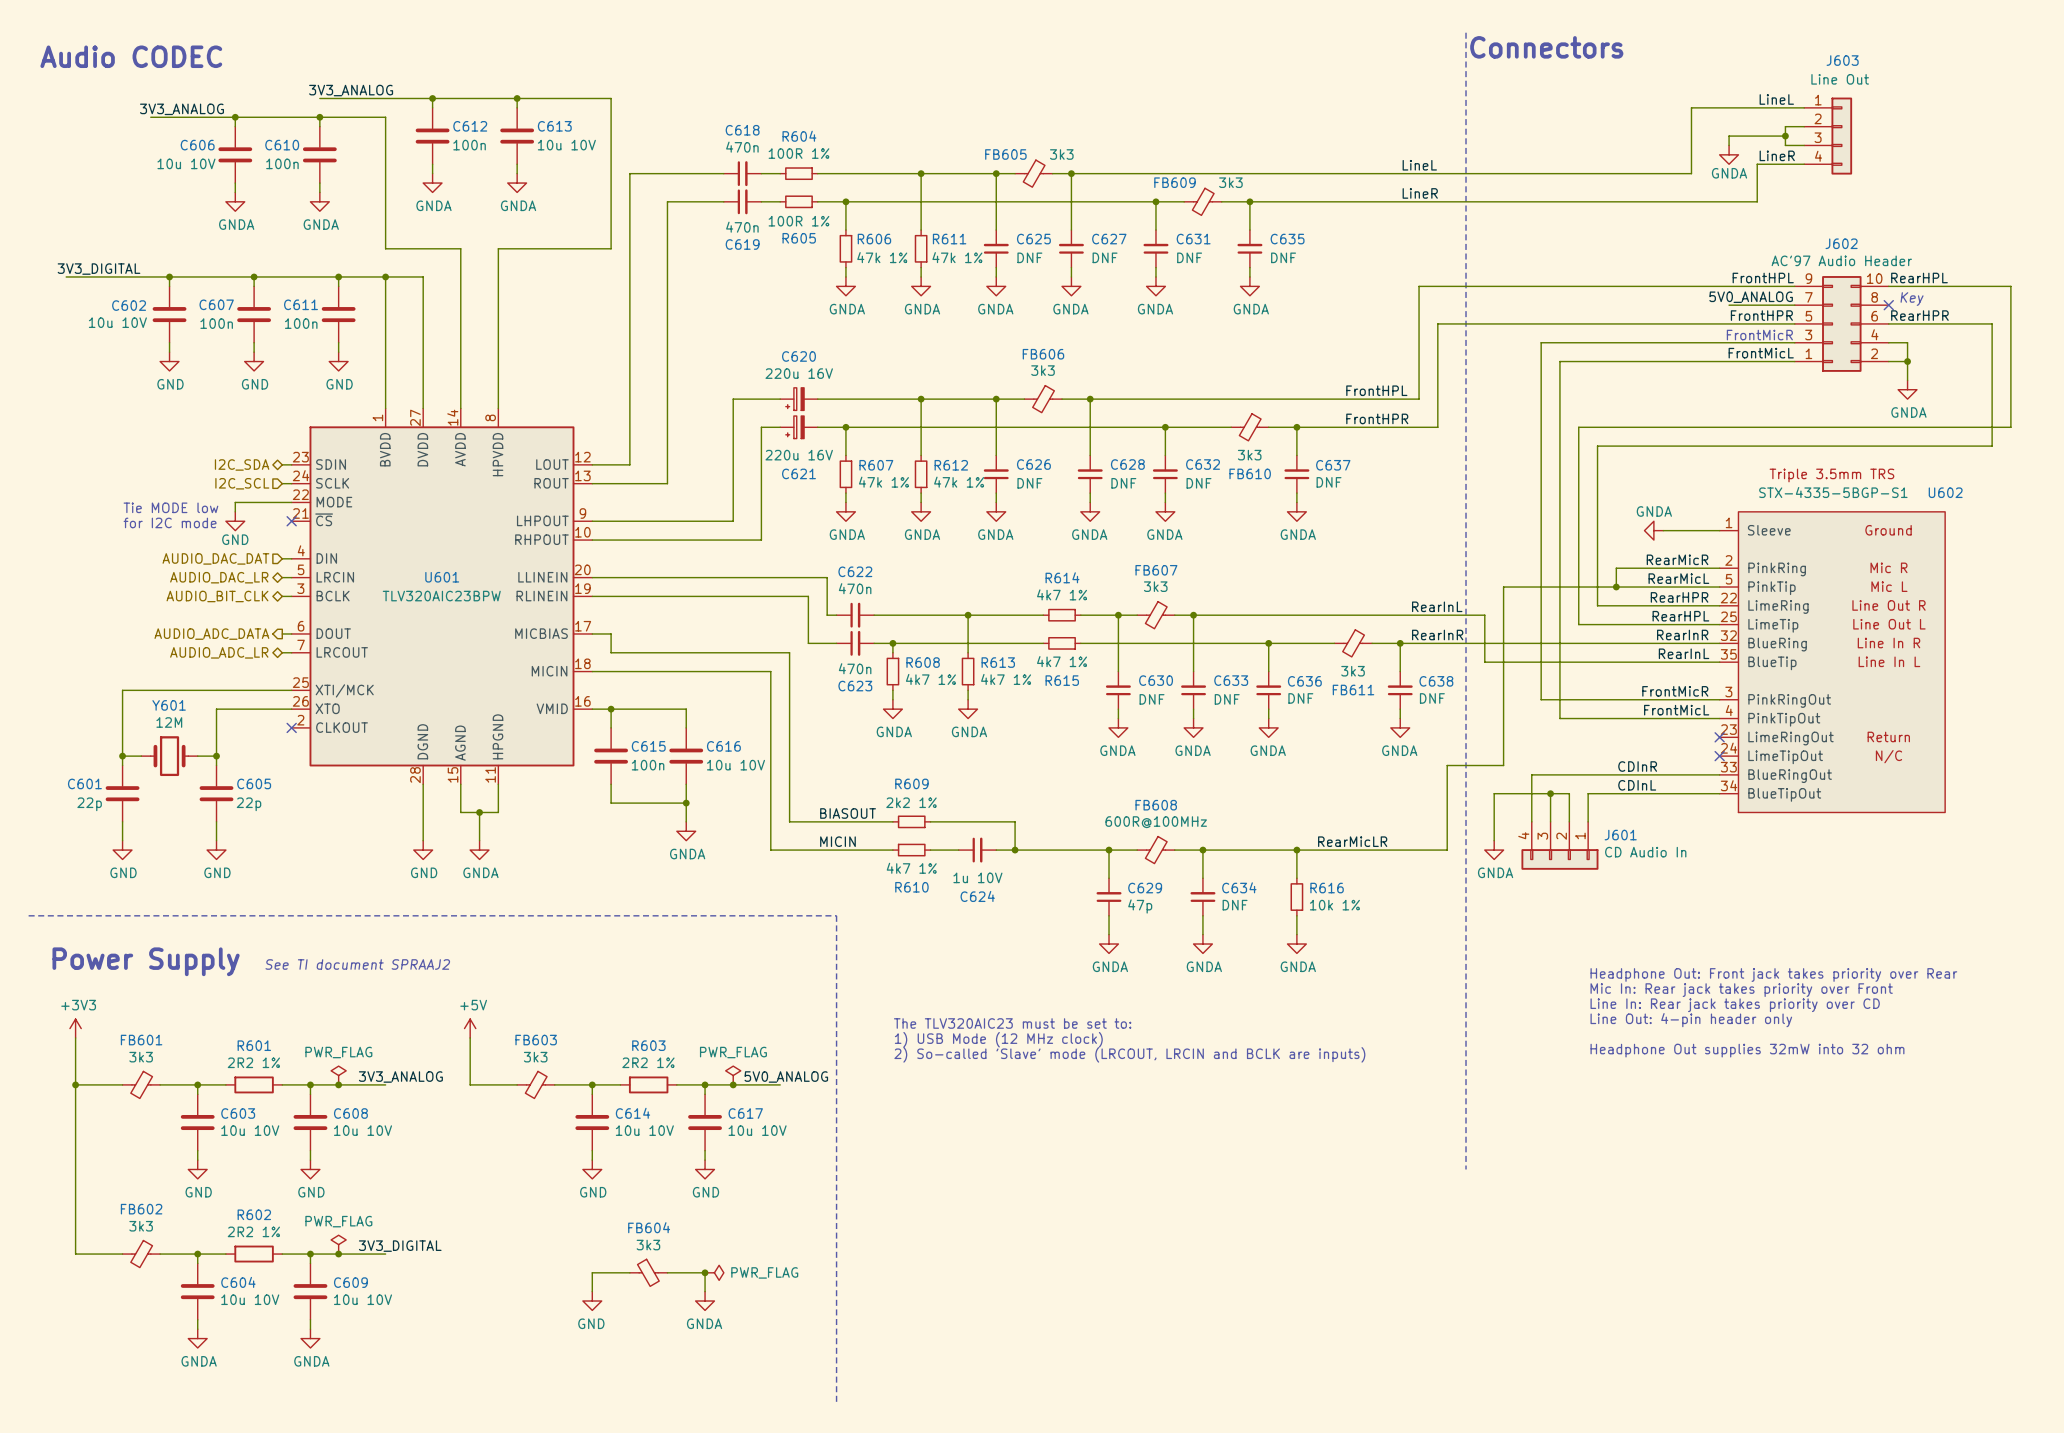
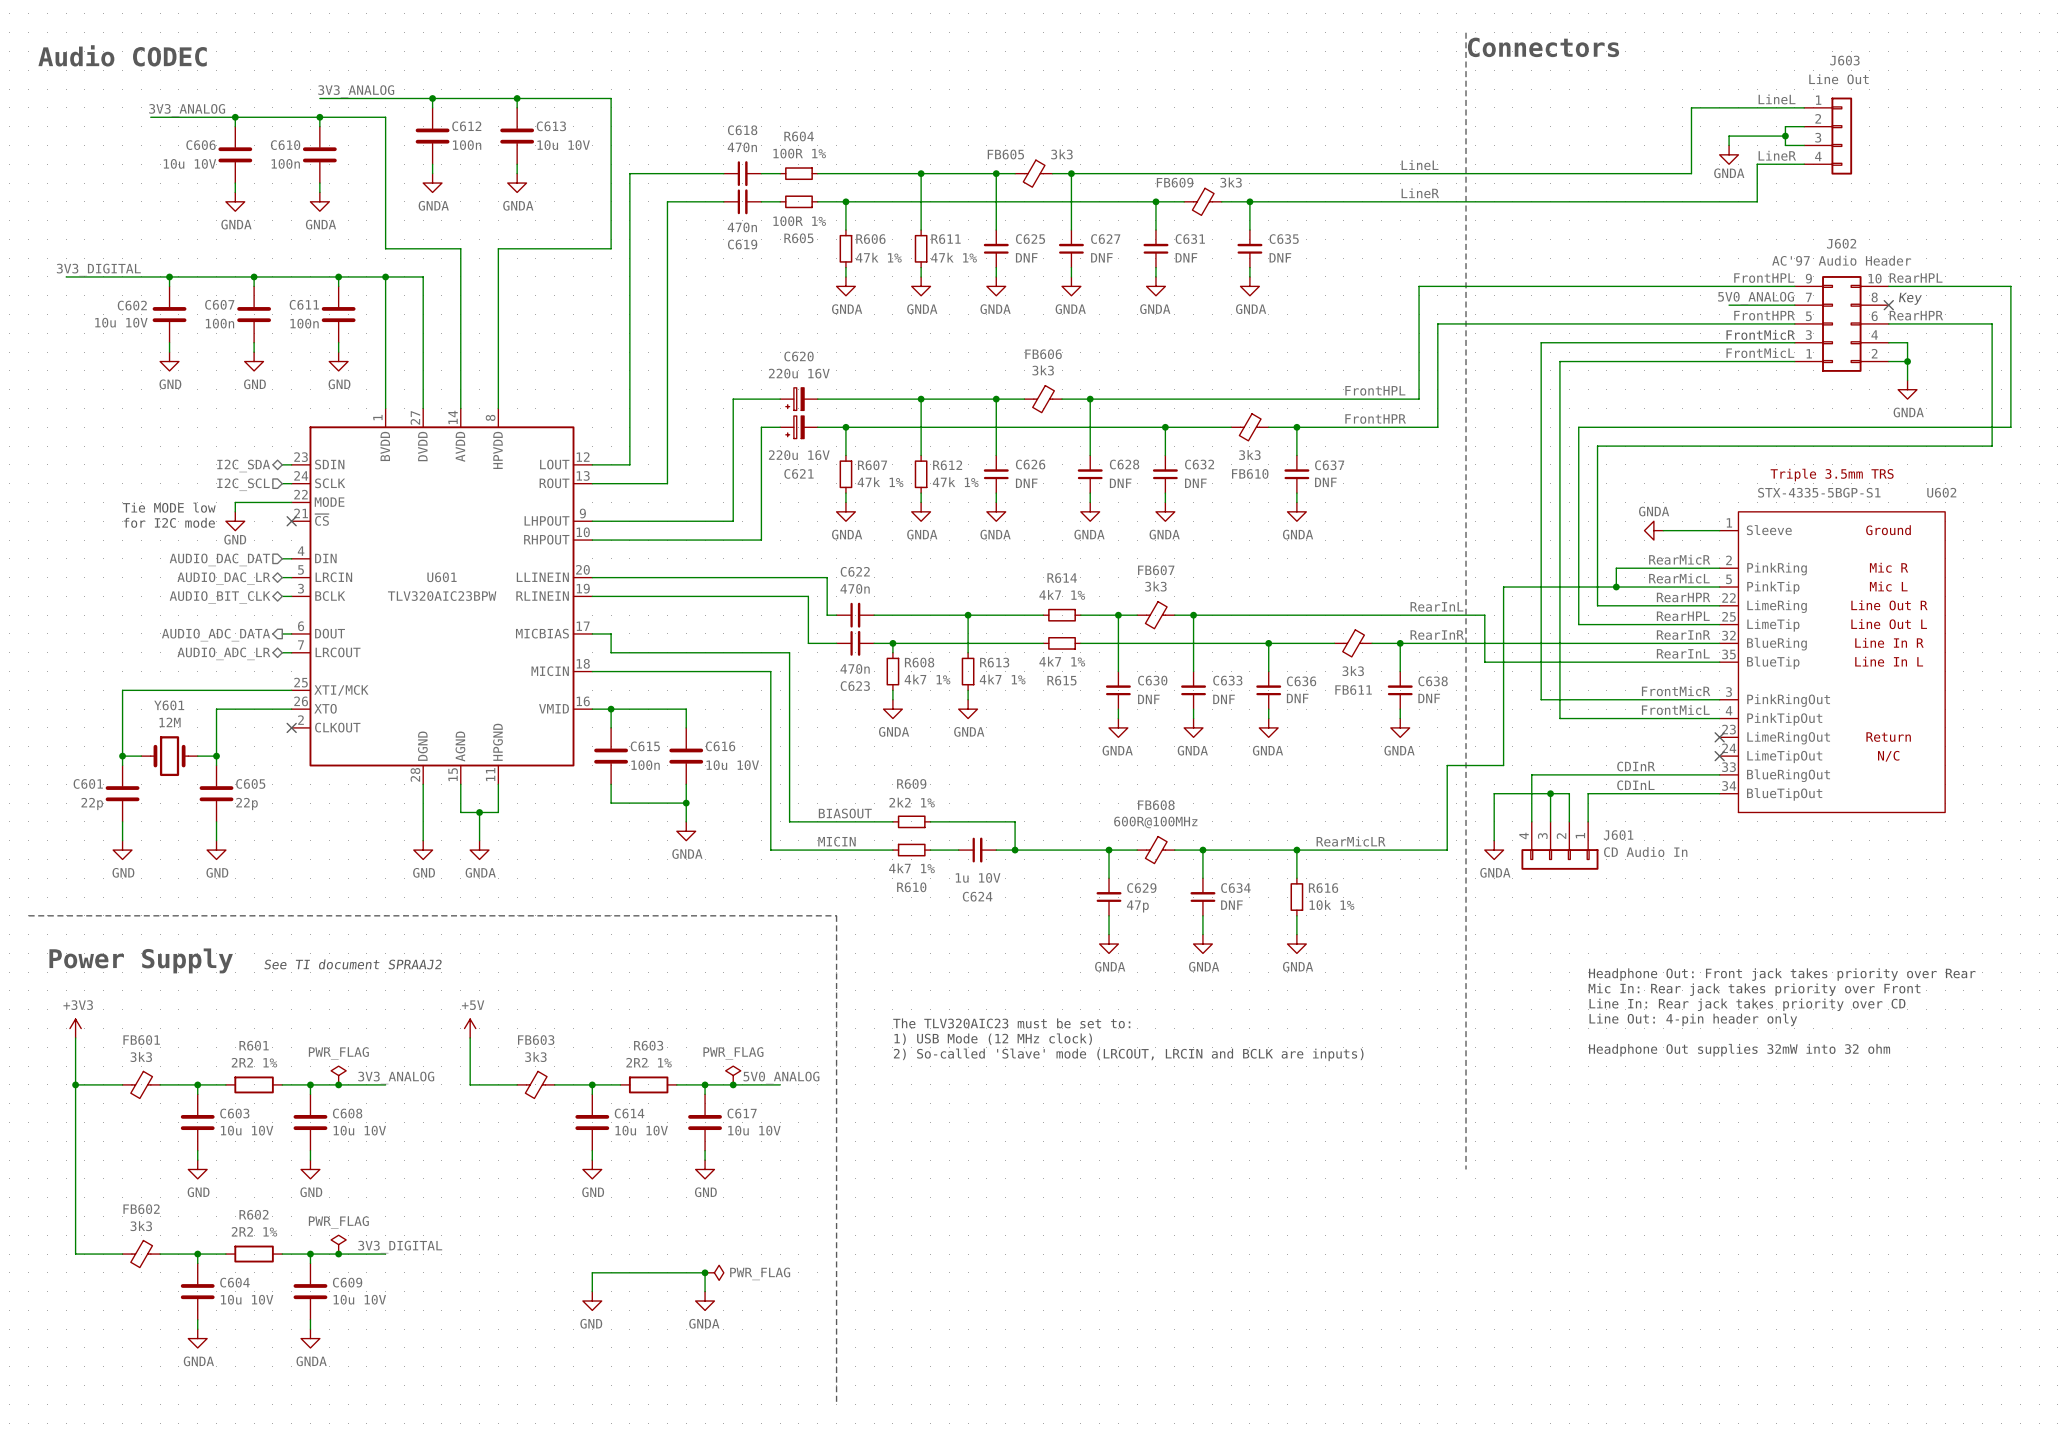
FB604: 3k3 (648, 1272) -> none

